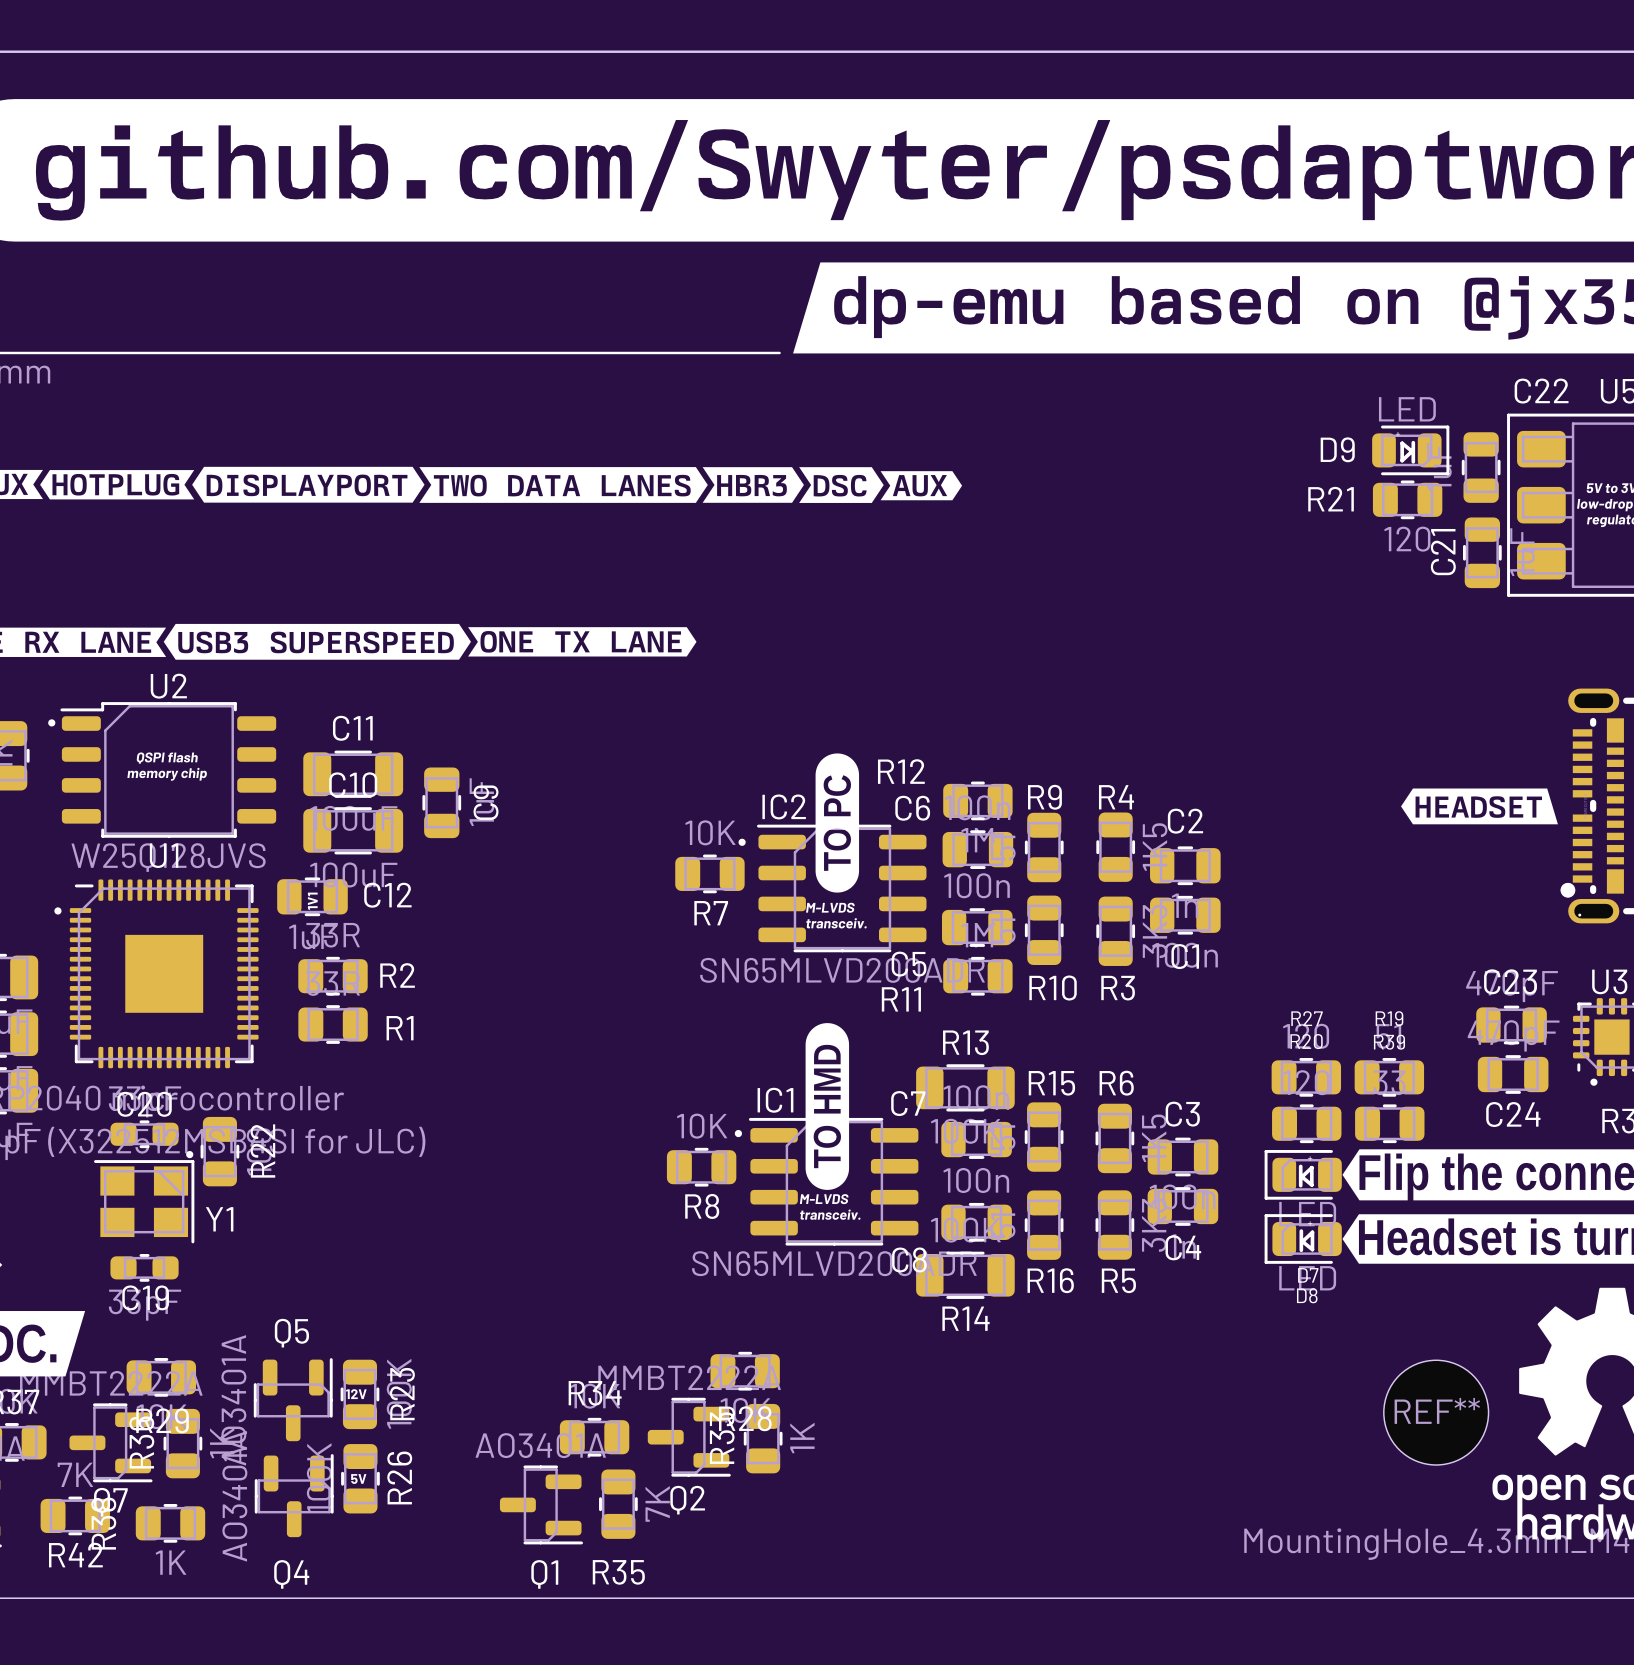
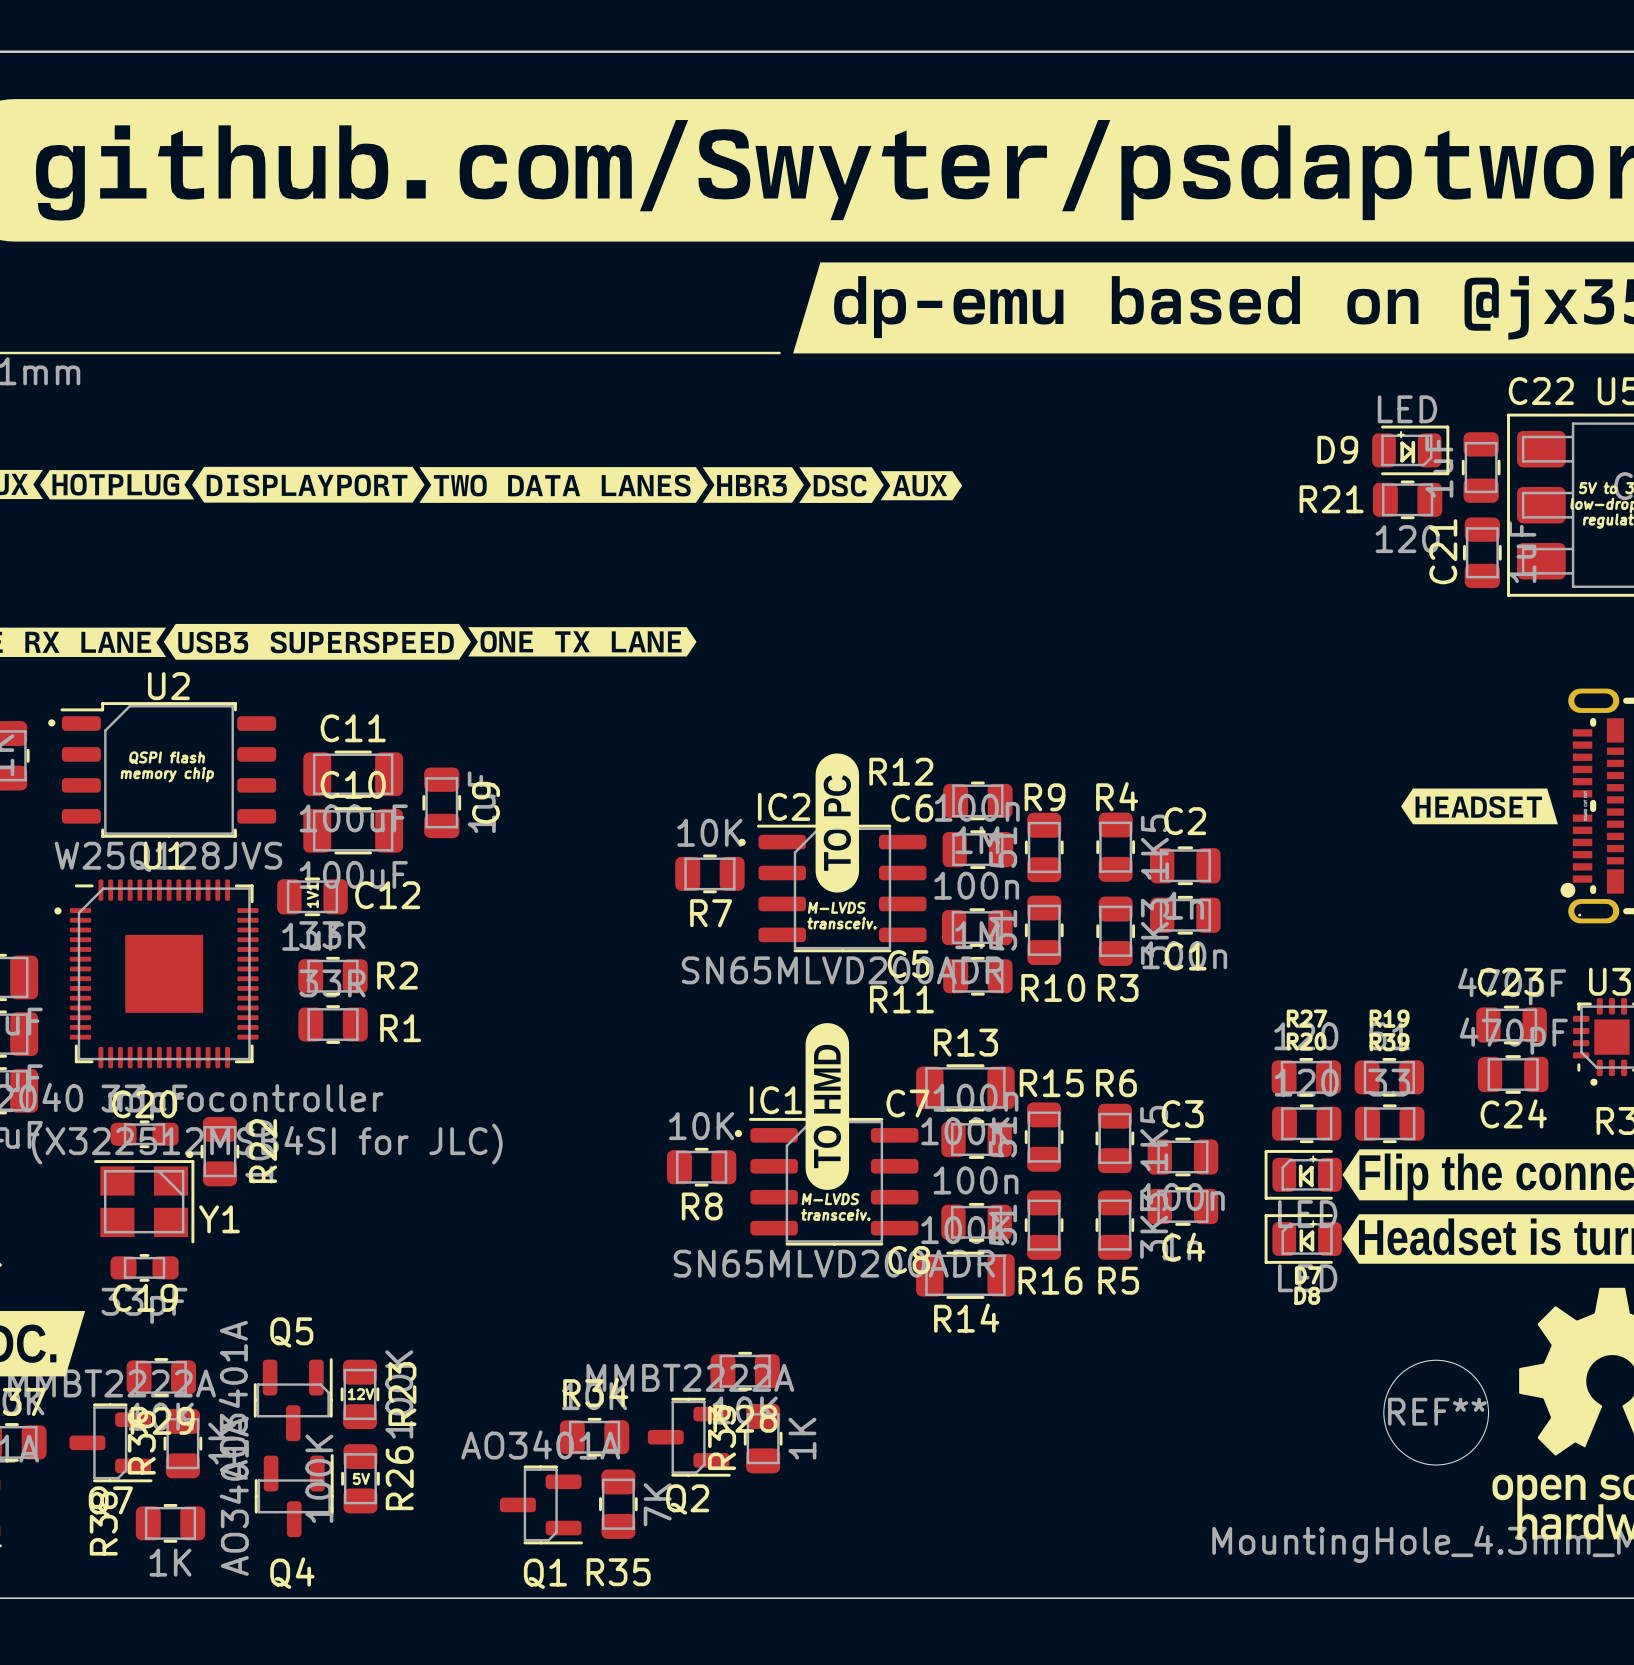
R42: 7K (75, 1515) -> none

